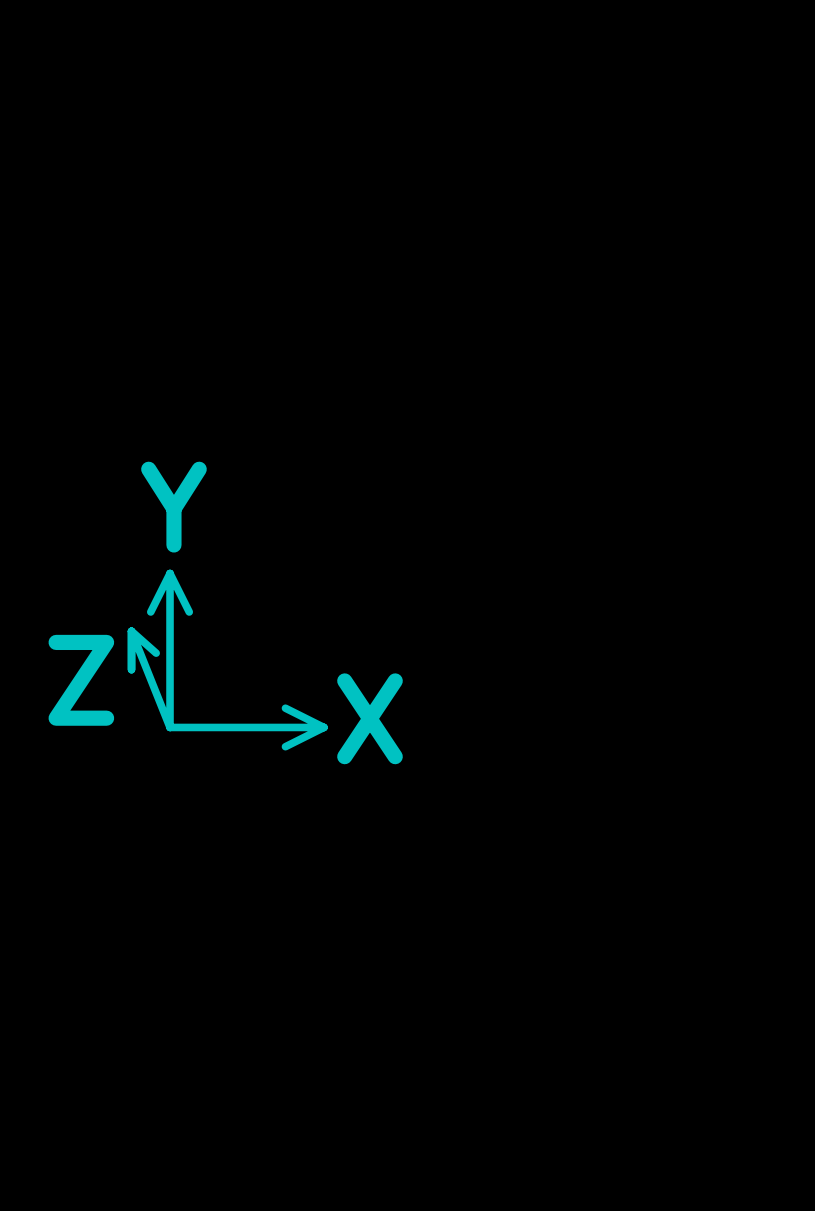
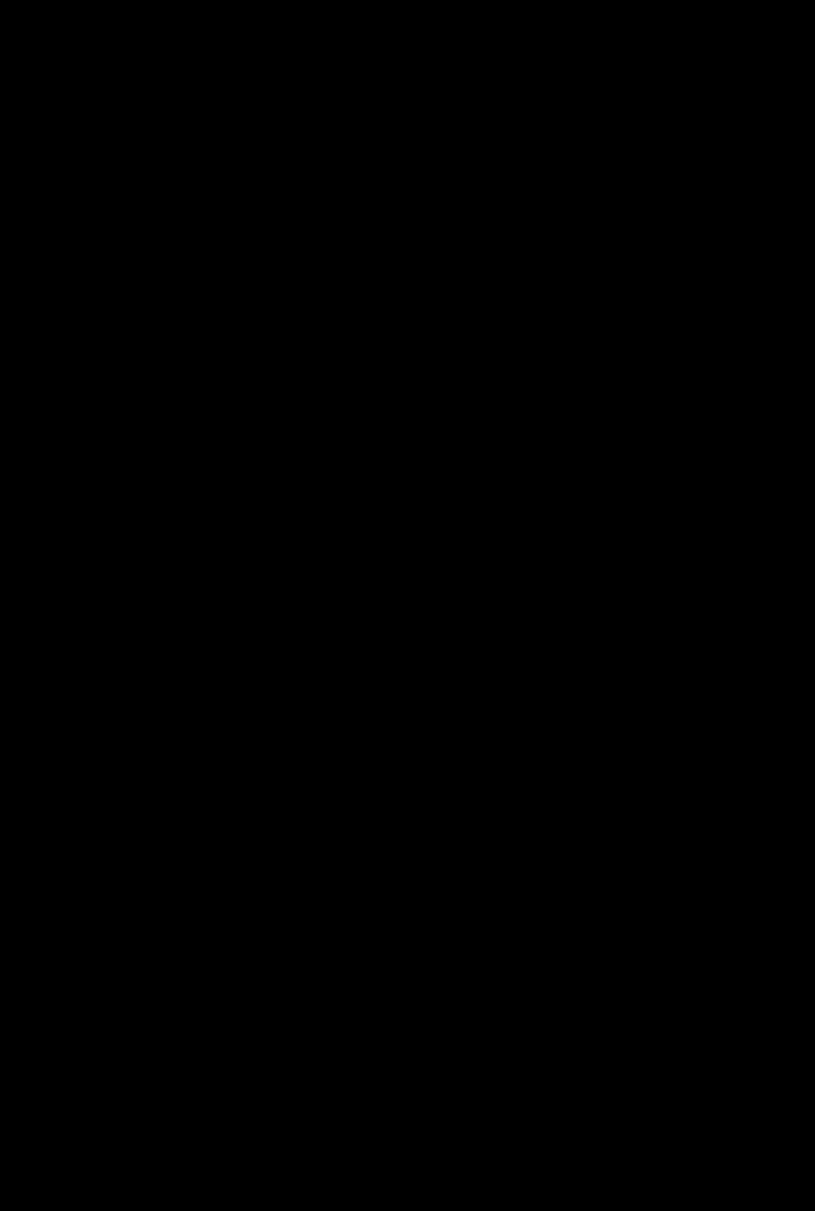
text: Y (173, 507) -> none
line: (170, 573) (170, 727) -> none
line: (170, 573) (189, 612) -> none
line: (170, 573) (150, 612) -> none
line: (131, 631) (156, 653) -> none
line: (131, 631) (170, 727) -> none
text: Z (81, 680) -> none
line: (285, 708) (323, 727) -> none
text: X (369, 718) -> none
line: (170, 727) (323, 727) -> none
line: (323, 727) (285, 746) -> none

